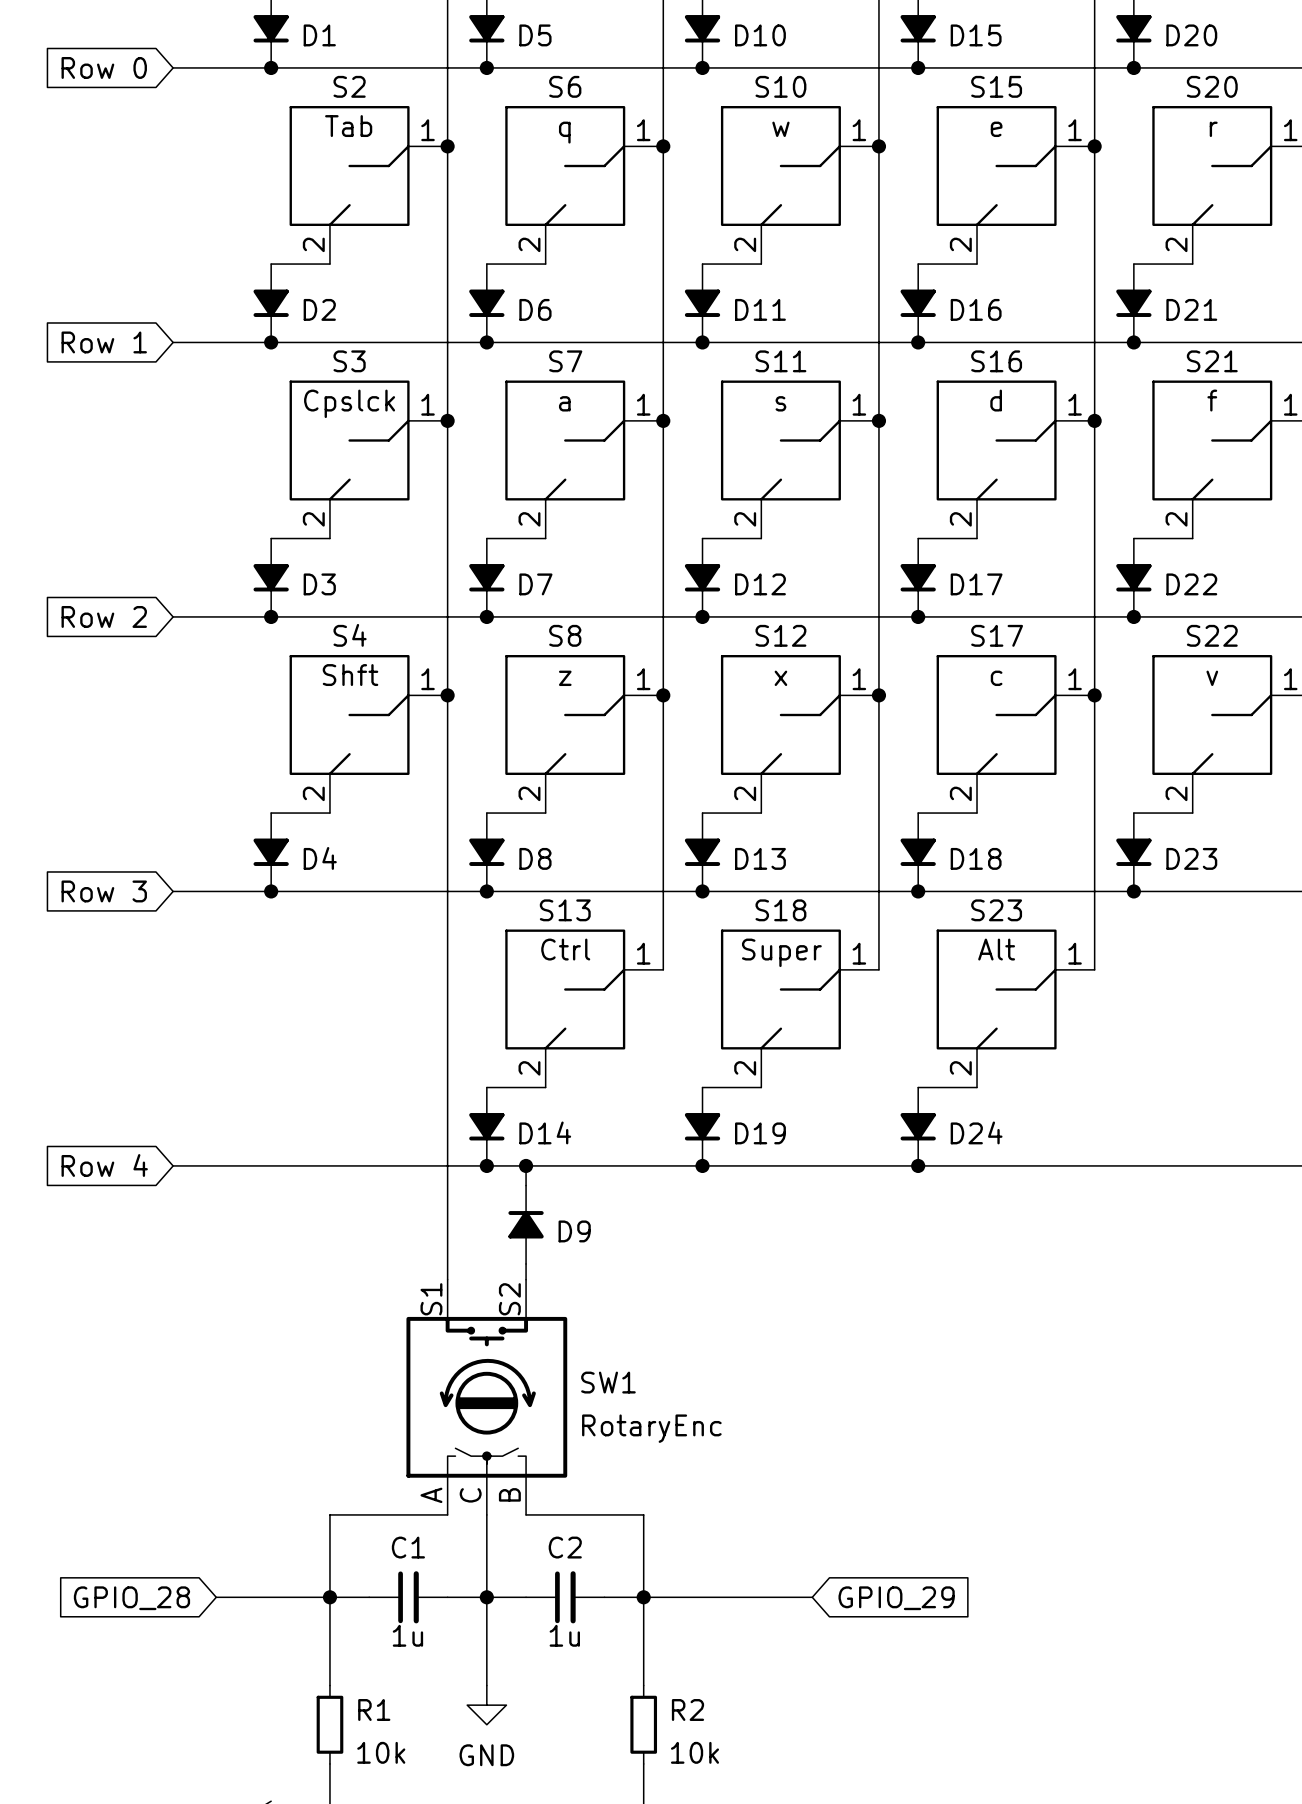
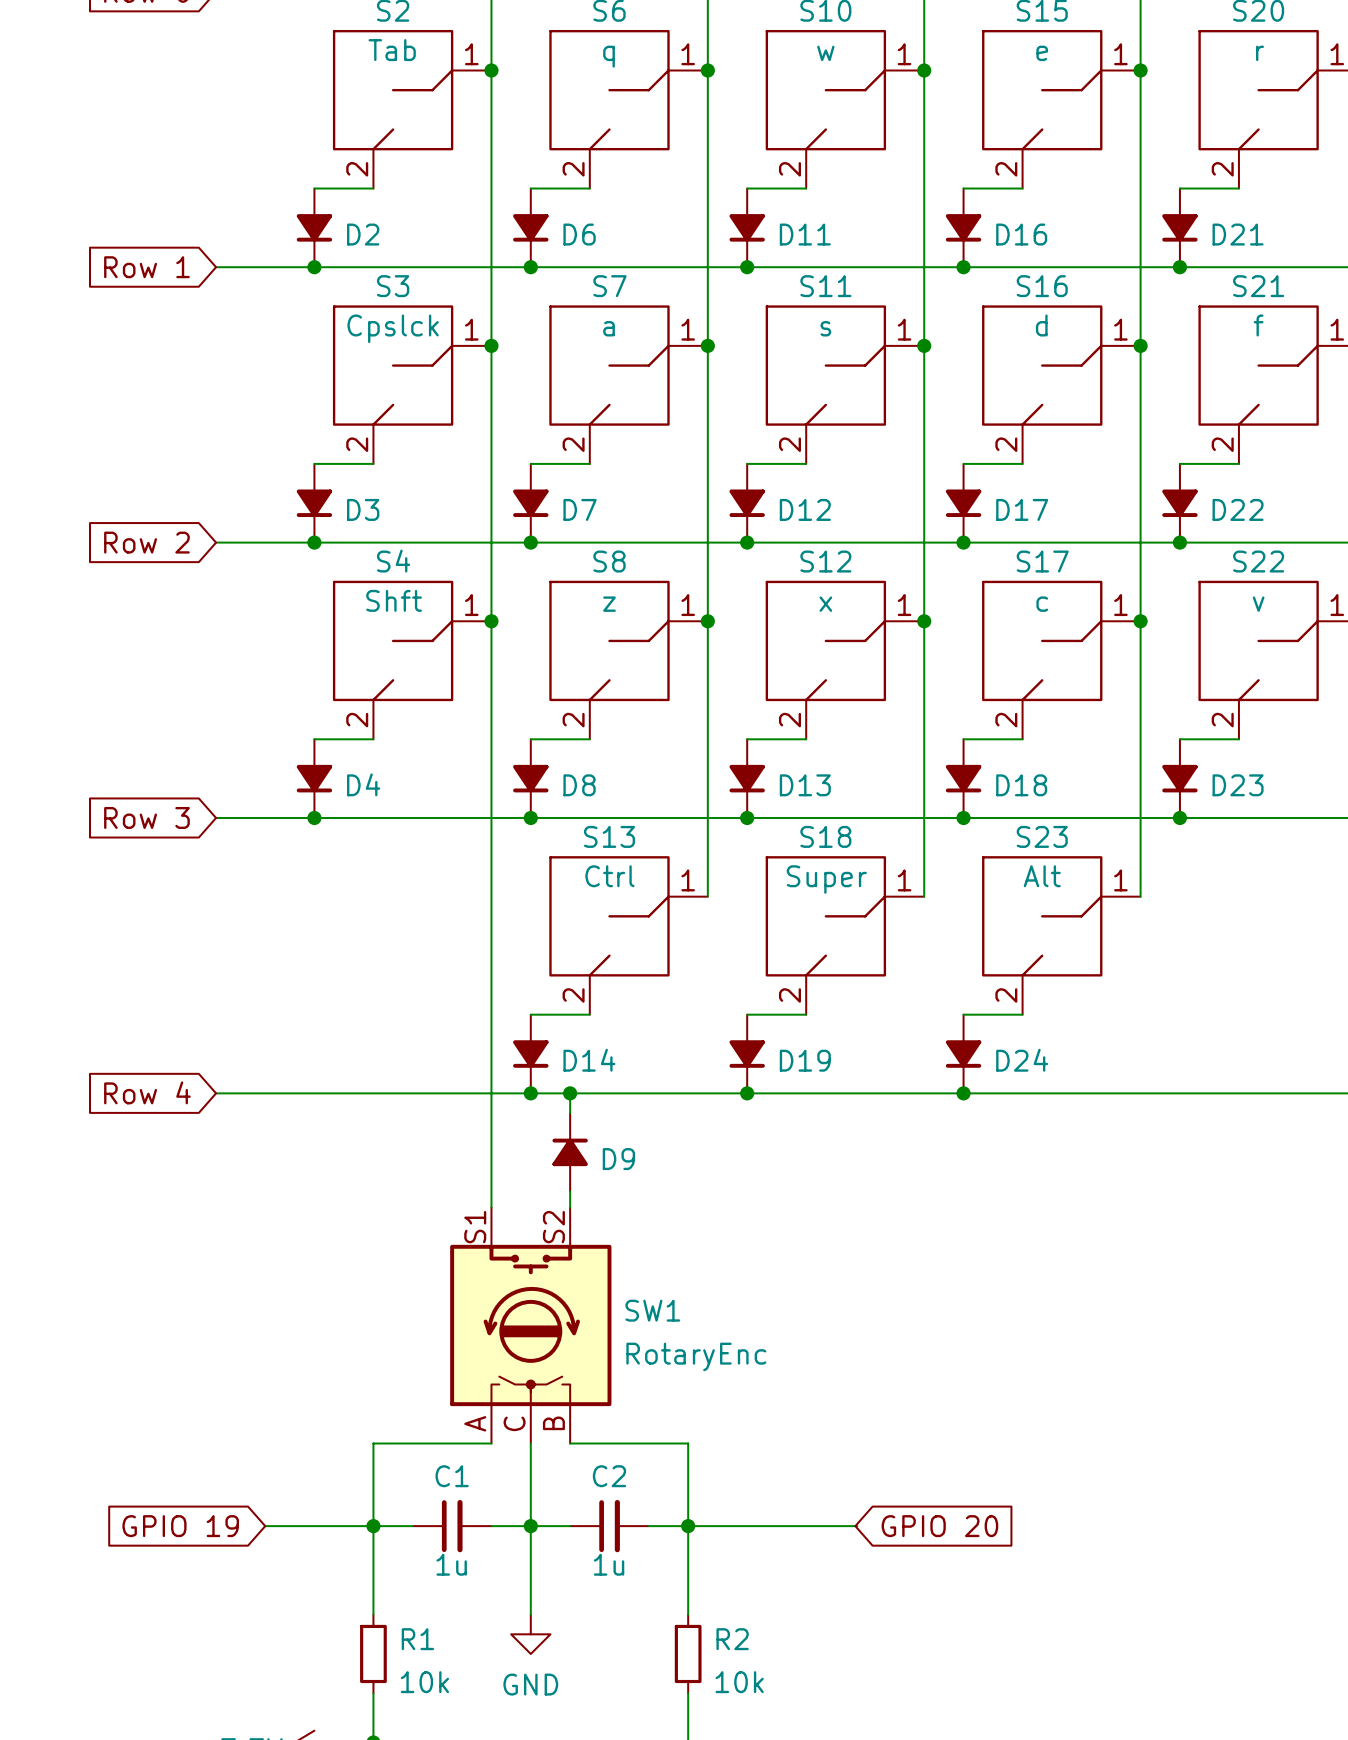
wire: (216, 1597) (222, 1597) -> none
global label: GPIO_28 (131, 1598) -> GPIO 19 (180, 1526)
global label: GPIO_29 (896, 1598) -> GPIO 20 (939, 1526)

